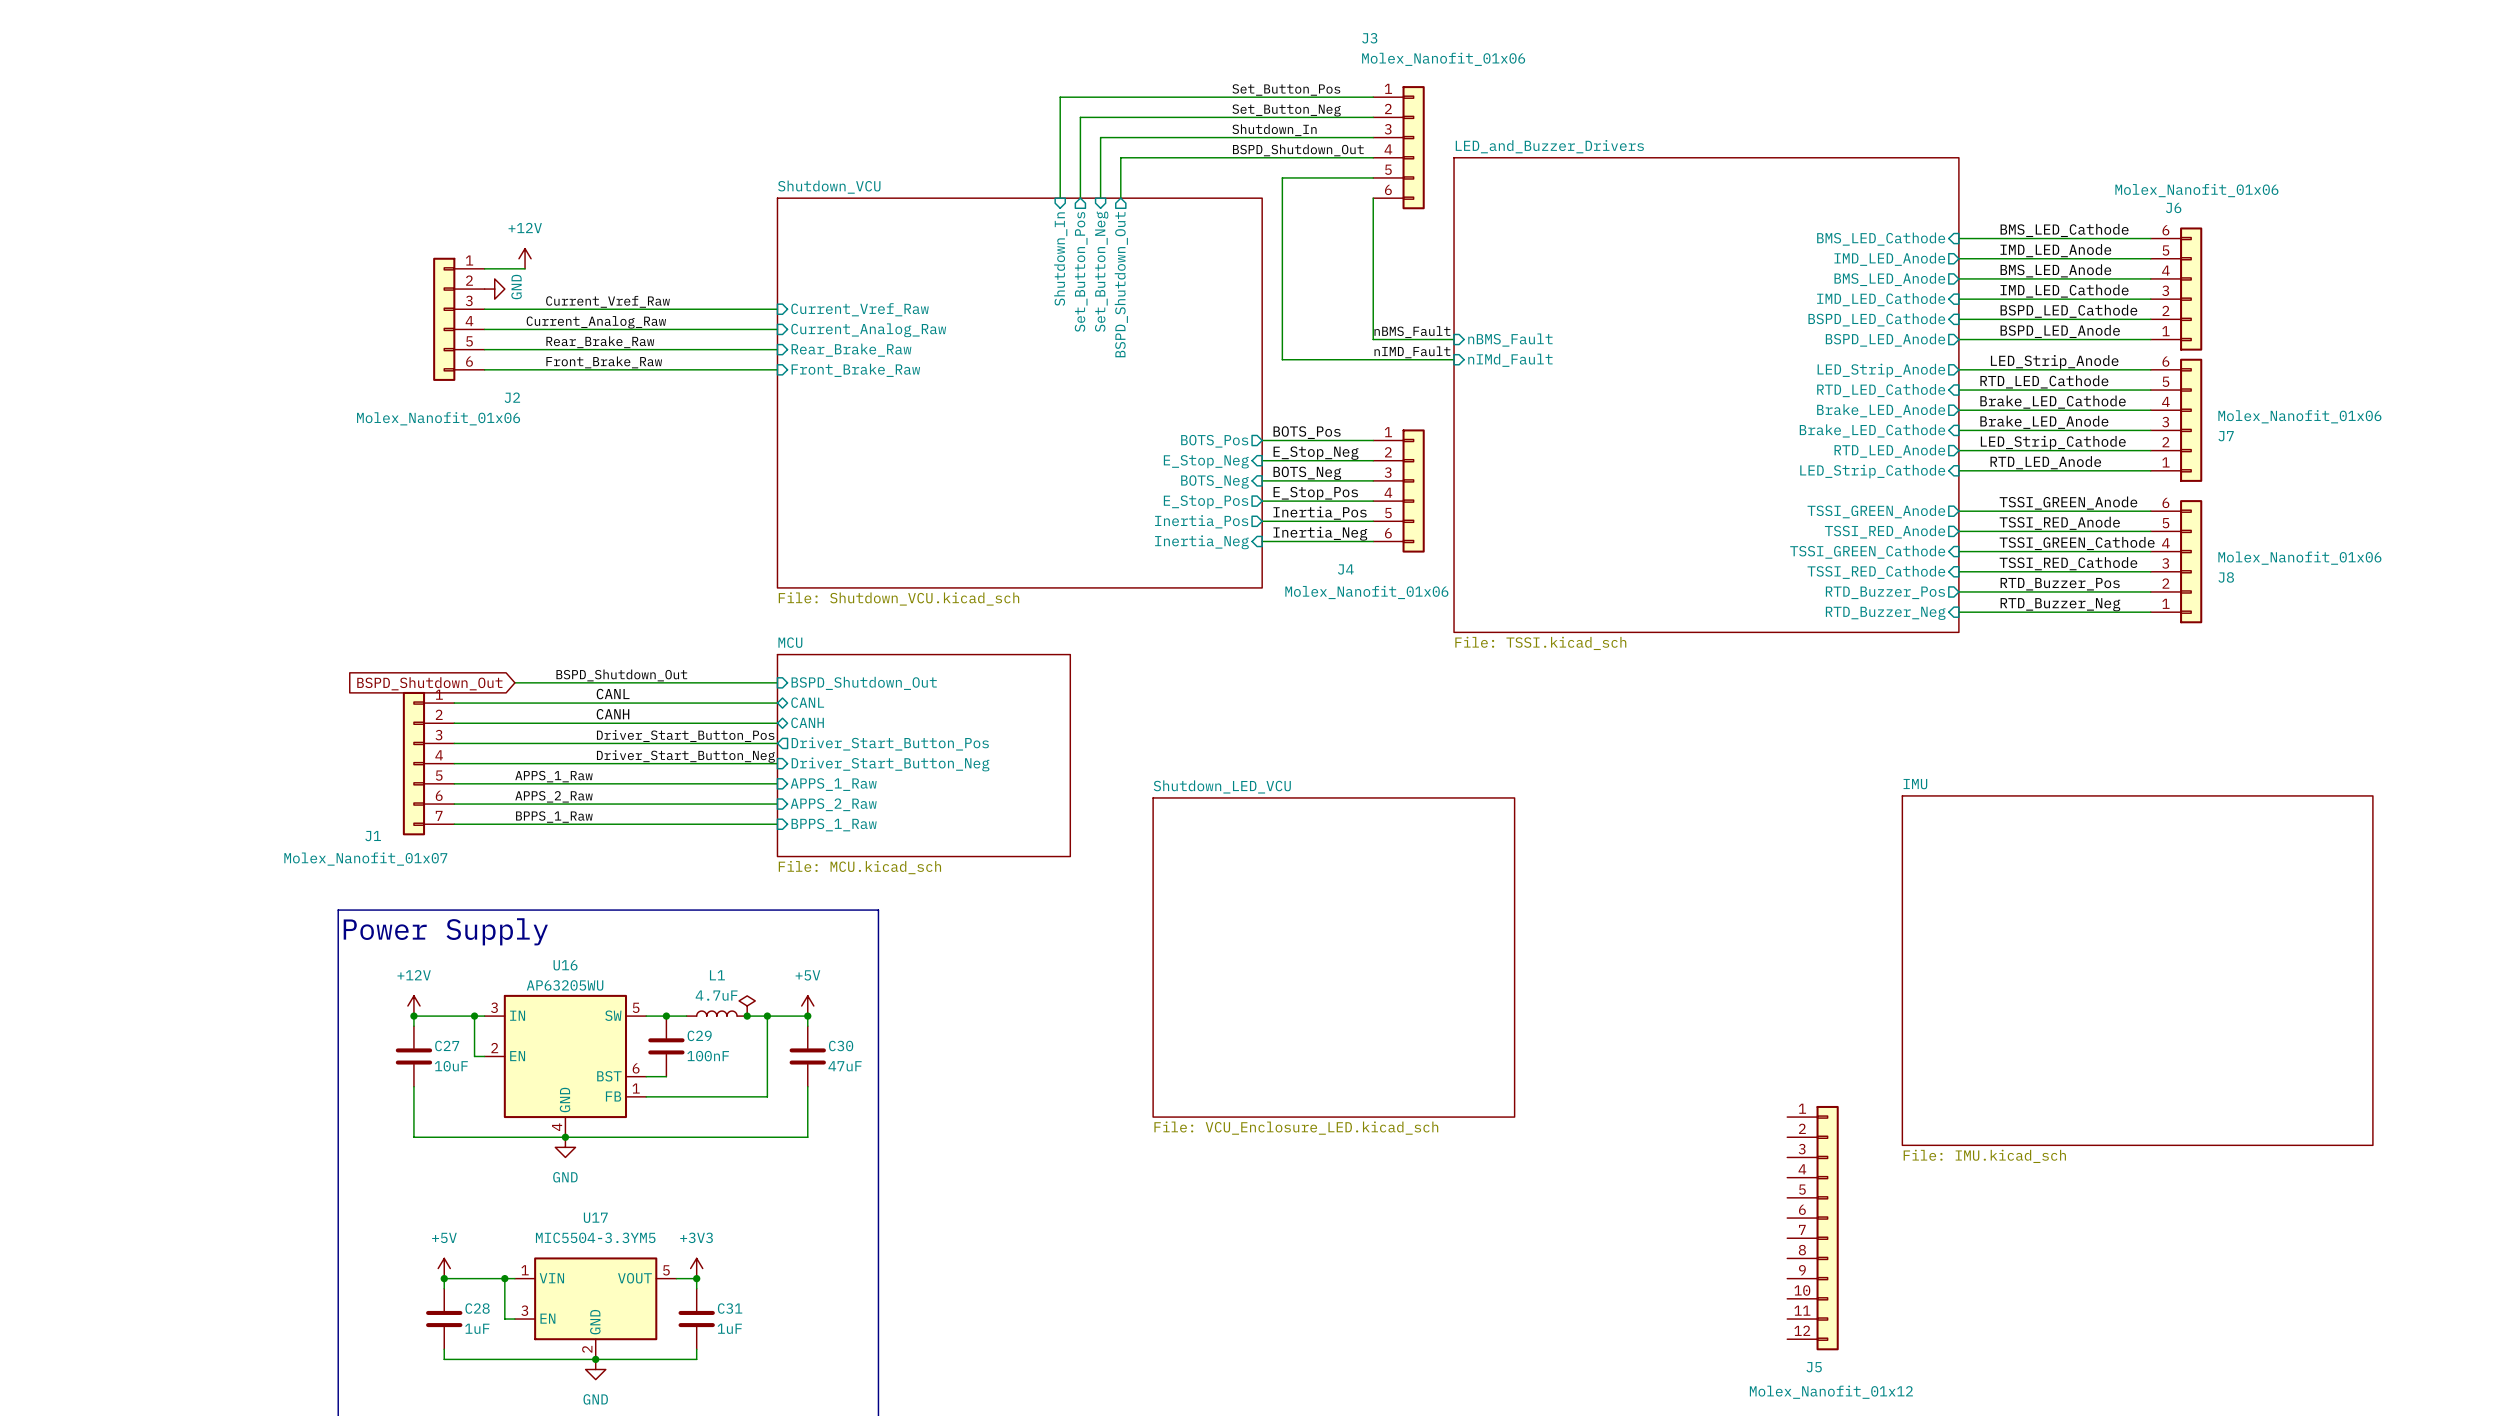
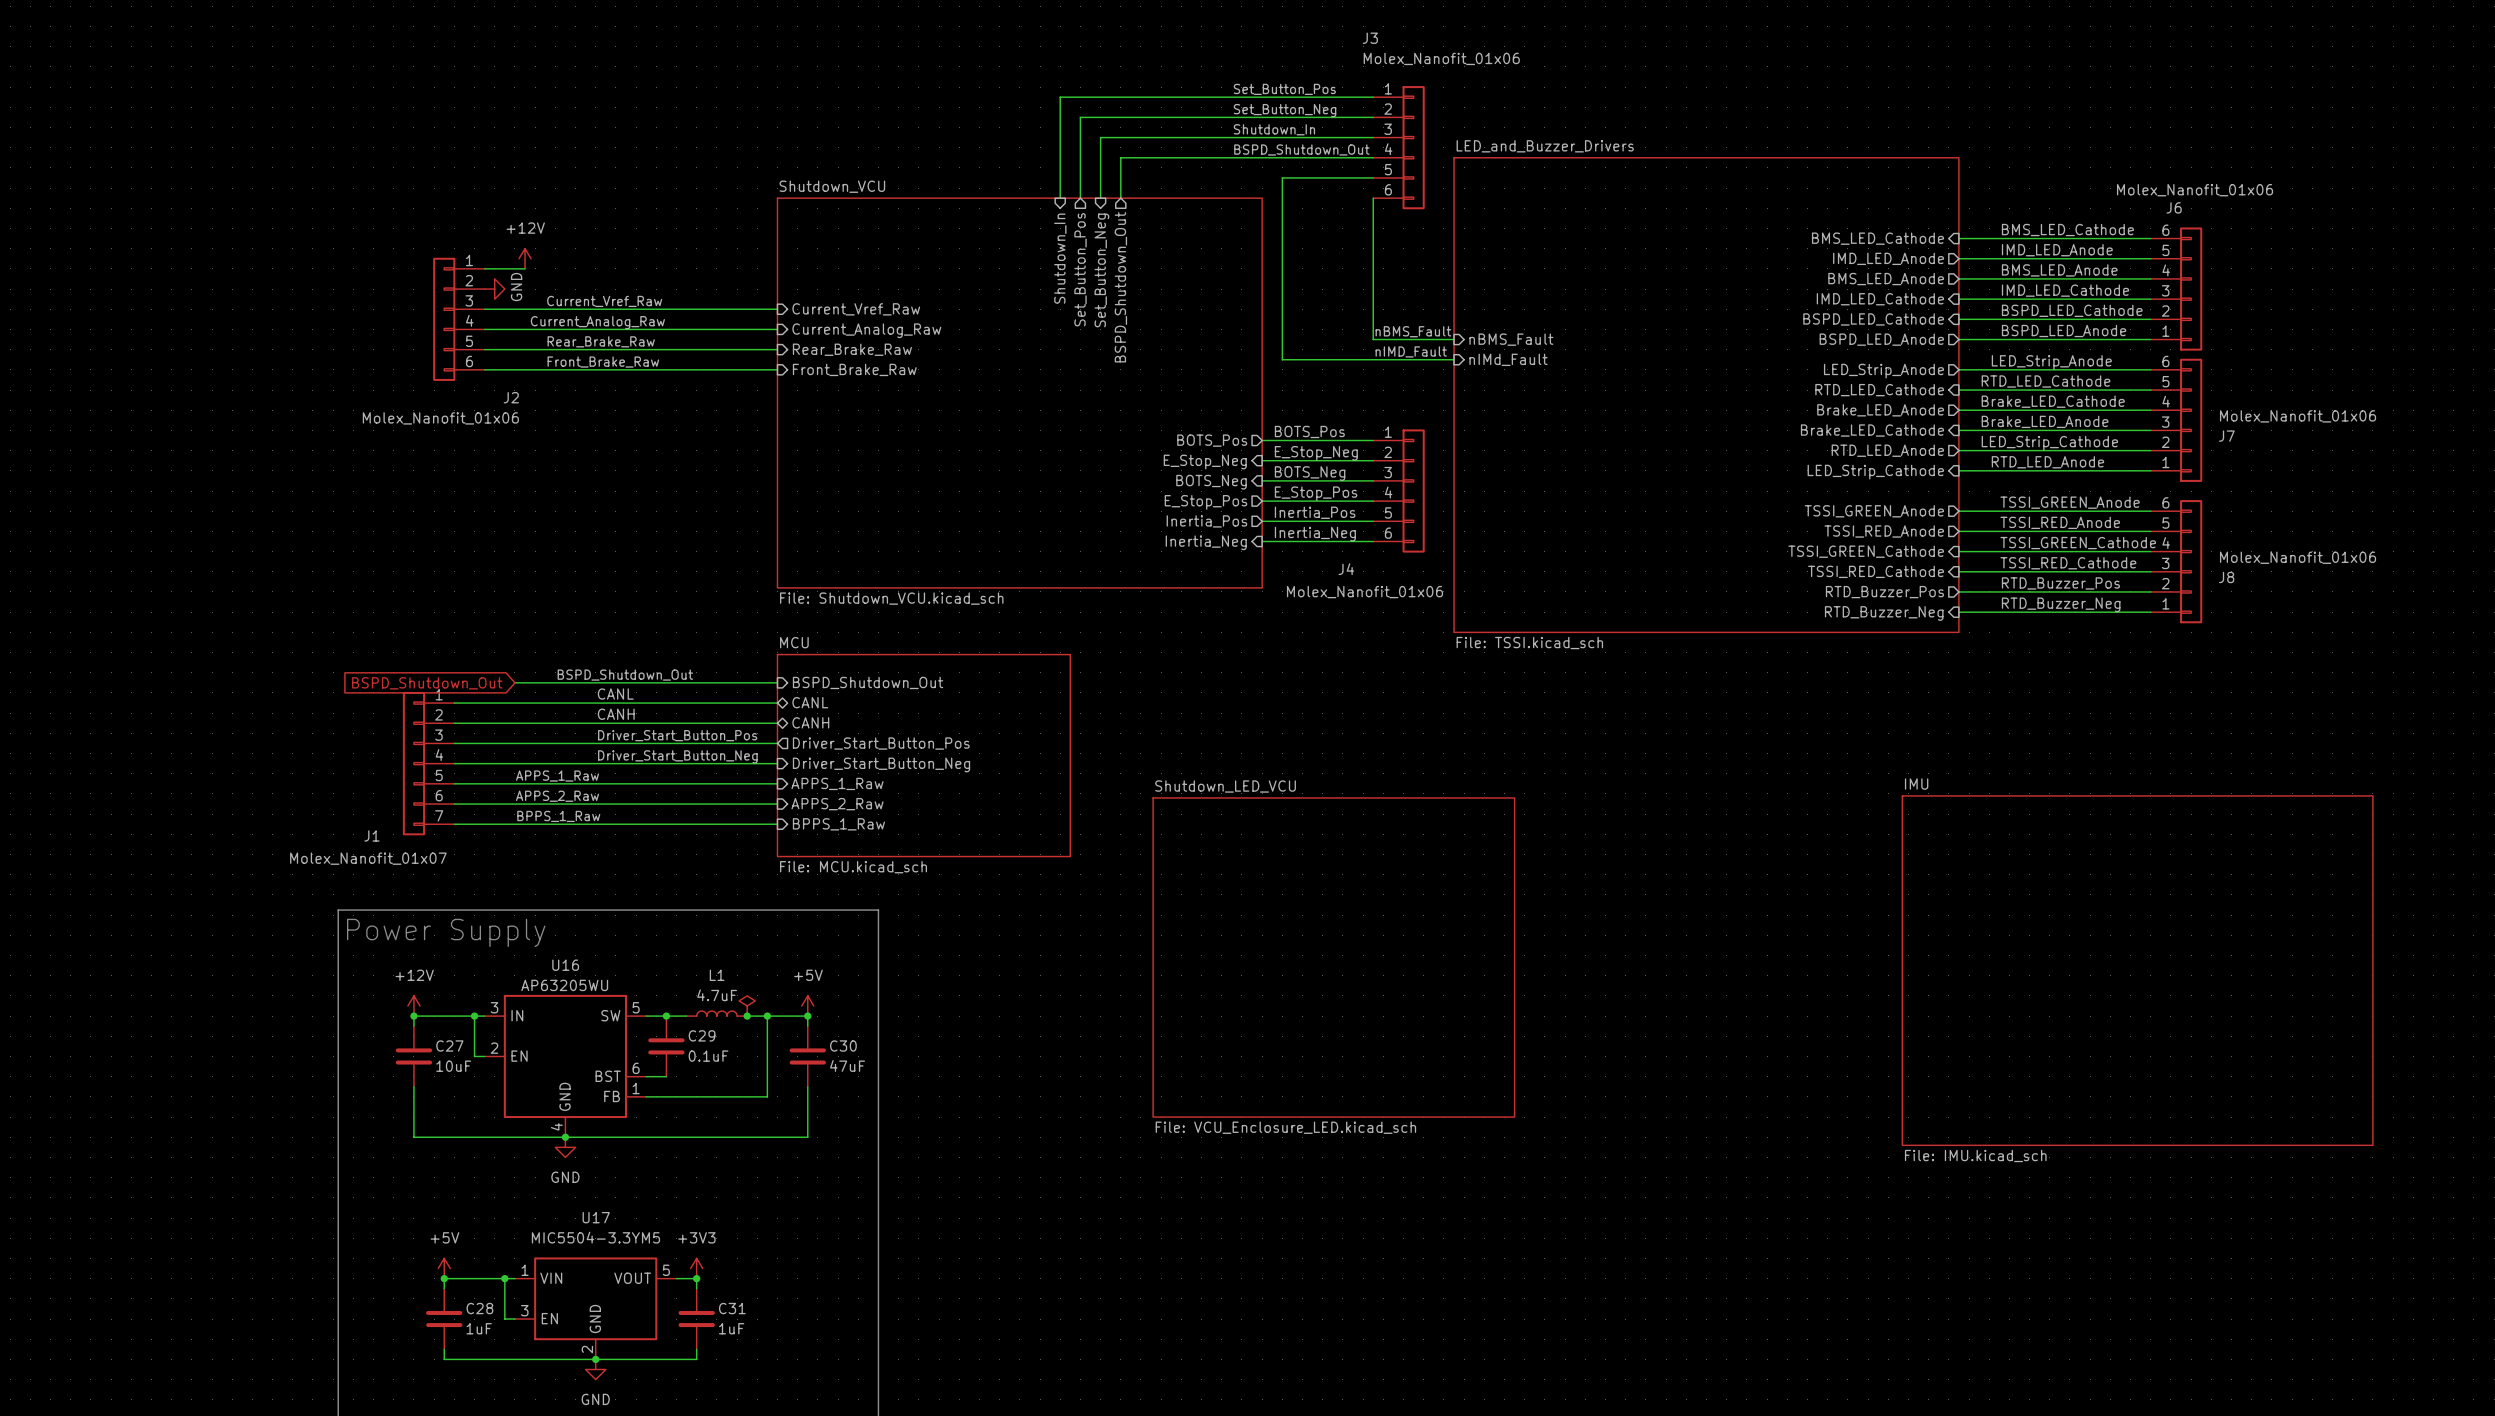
C29 value: 100nF (708, 1056) -> 0.1uF (708, 1056)
J5: Molex_Nanofit_01x12 (1812, 1228) -> none

